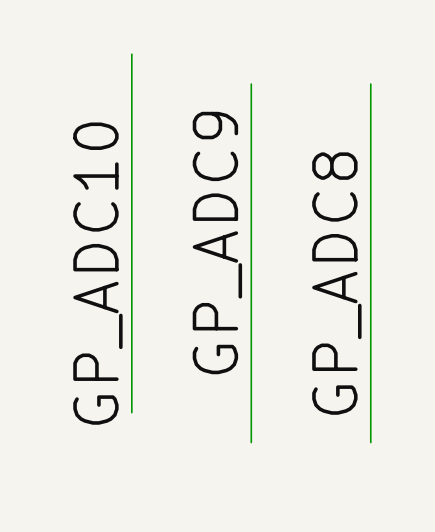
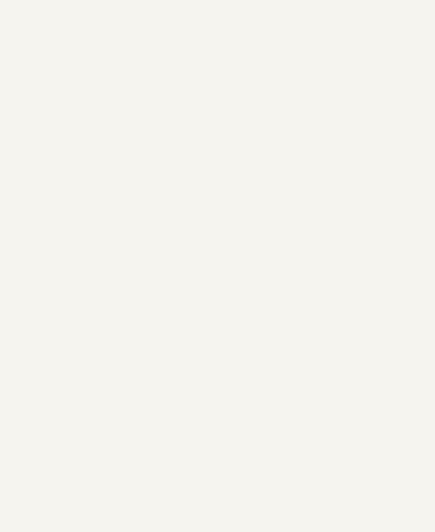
wire: (131, 54) (131, 412) -> none
wire: (251, 84) (251, 442) -> none
wire: (370, 84) (370, 442) -> none
label: GP_ADC9 (217, 243) -> none
label: GP_ADC10 (97, 273) -> none
label: GP_ADC8 (336, 283) -> none

